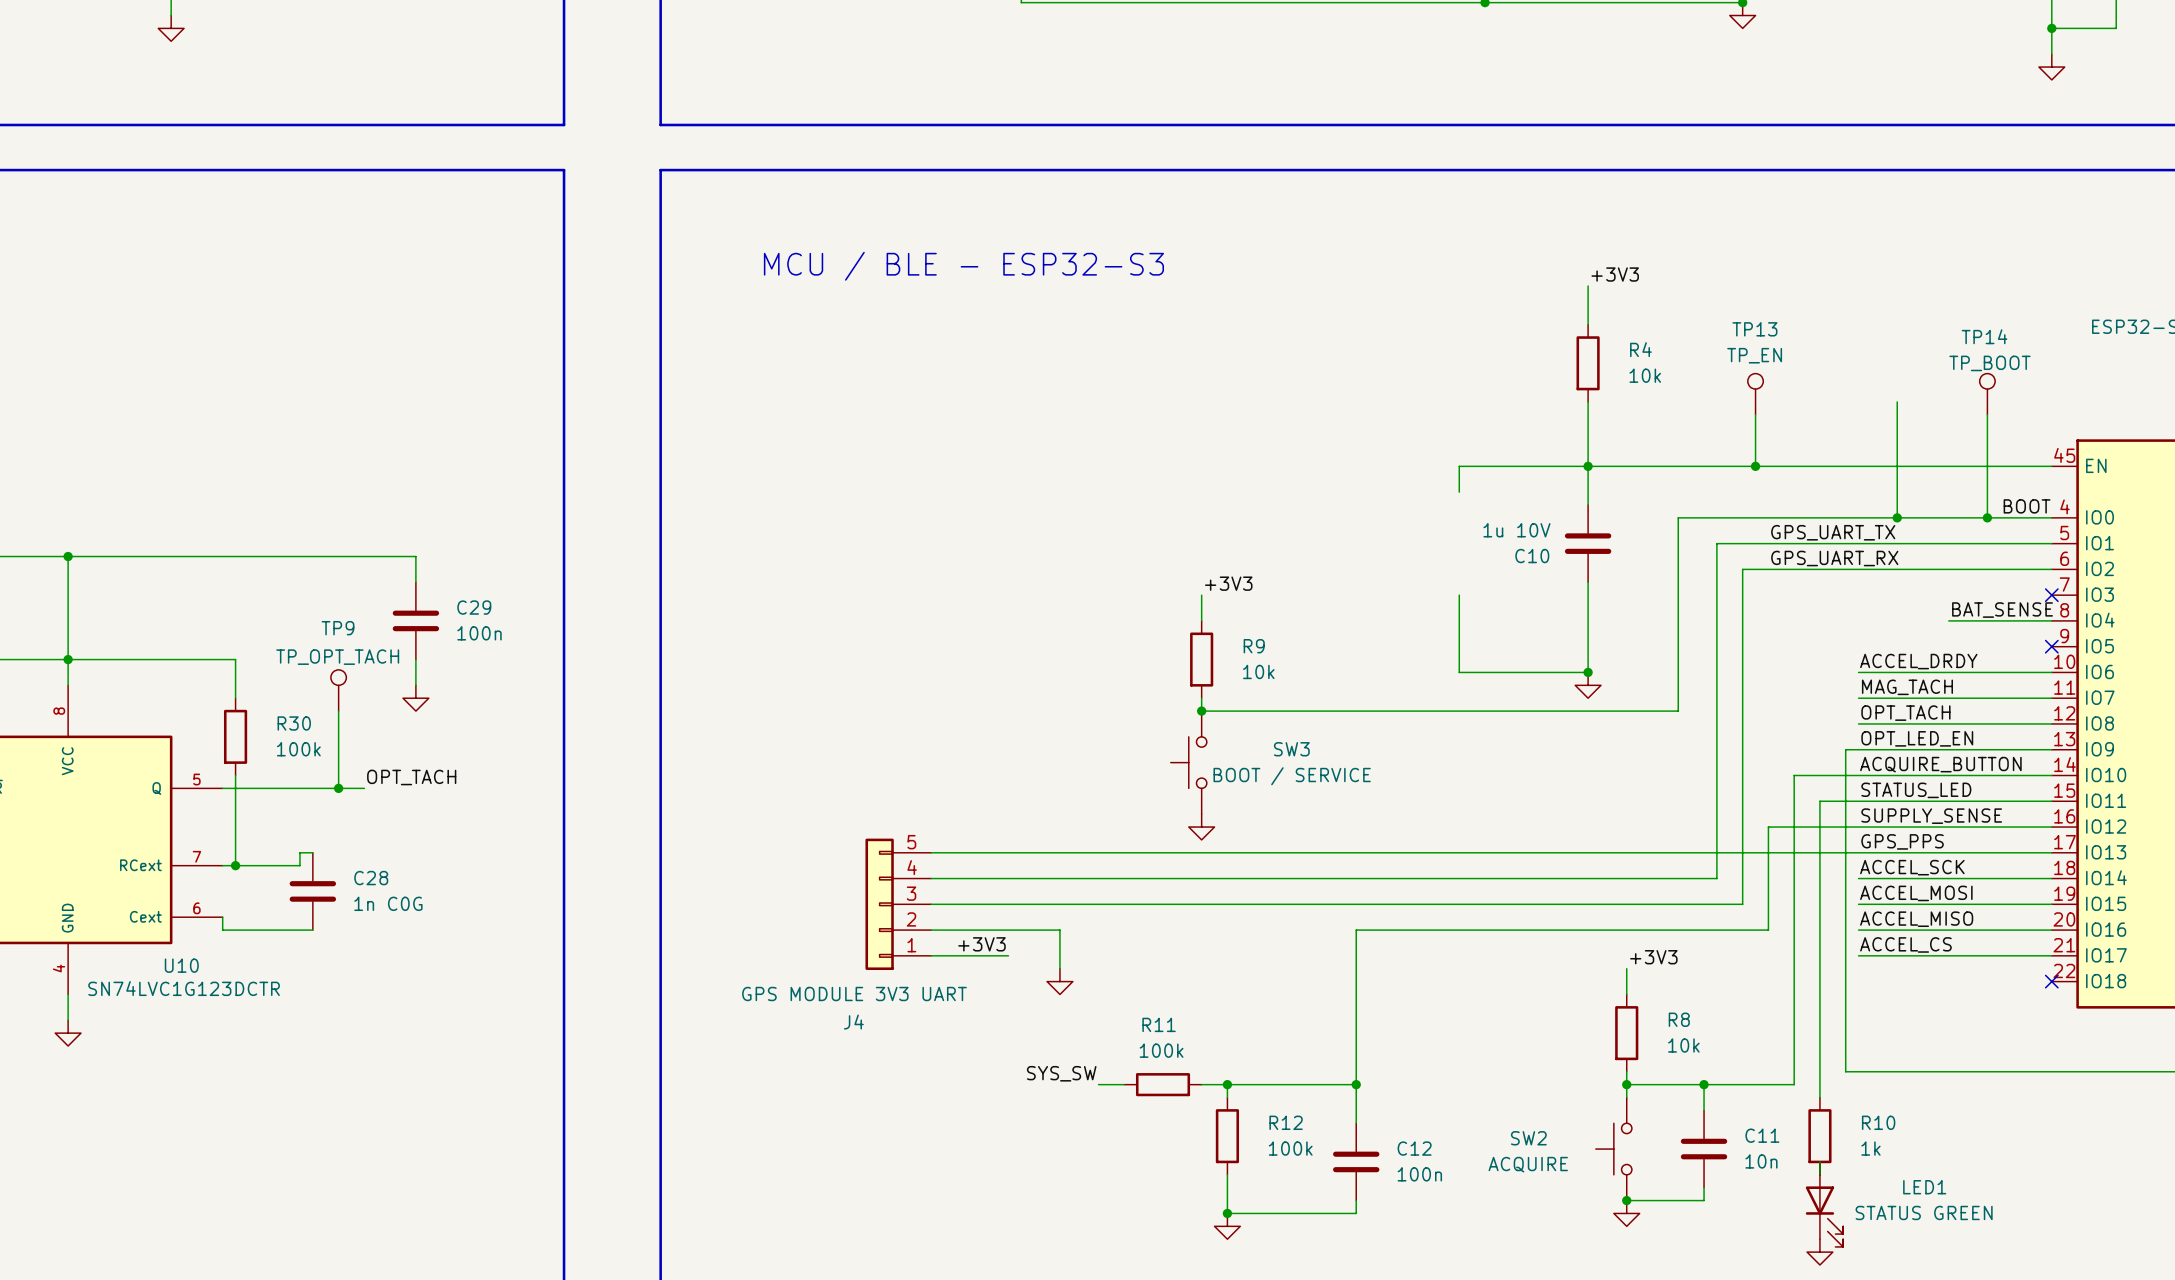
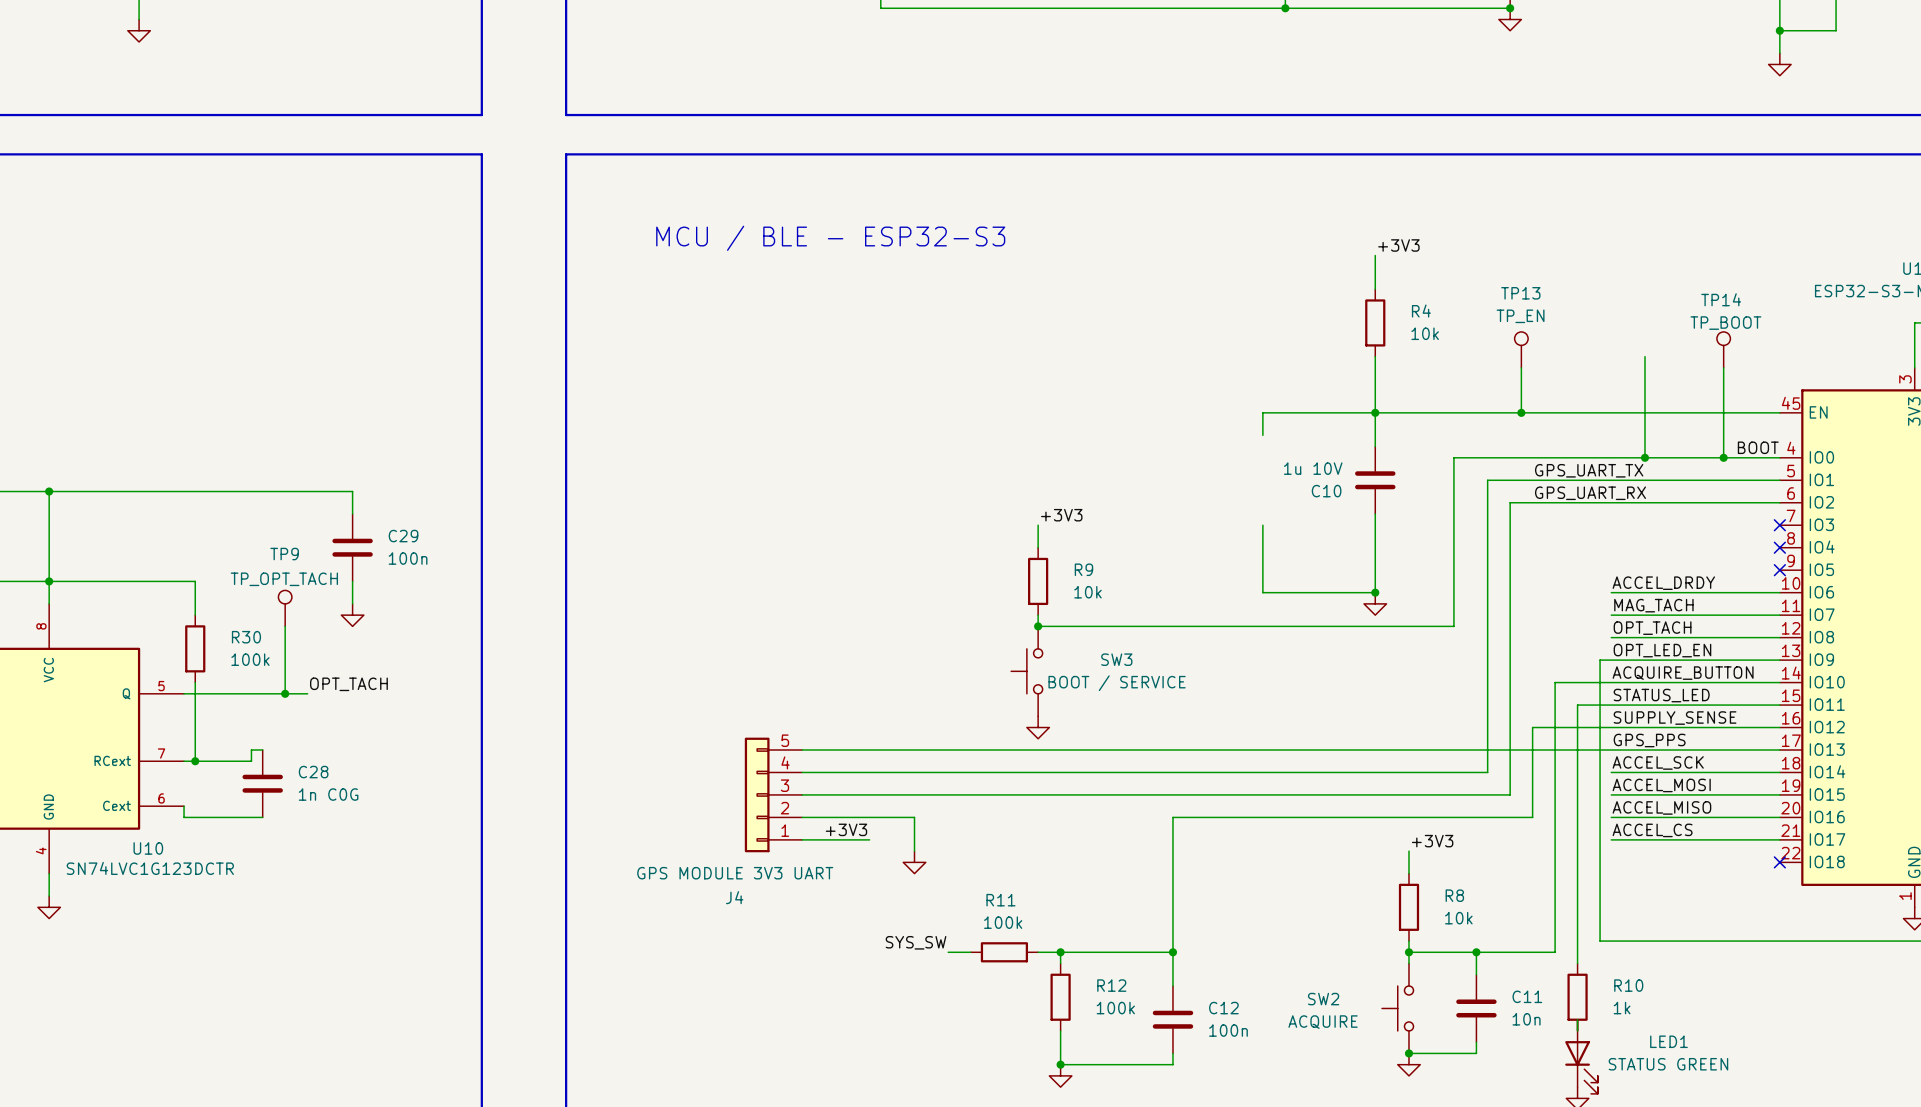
label: BAT_SENSE (2002, 610) -> none
wire: (1948, 620) (2051, 620) -> none
no-connect mark: none -> (1779, 547)

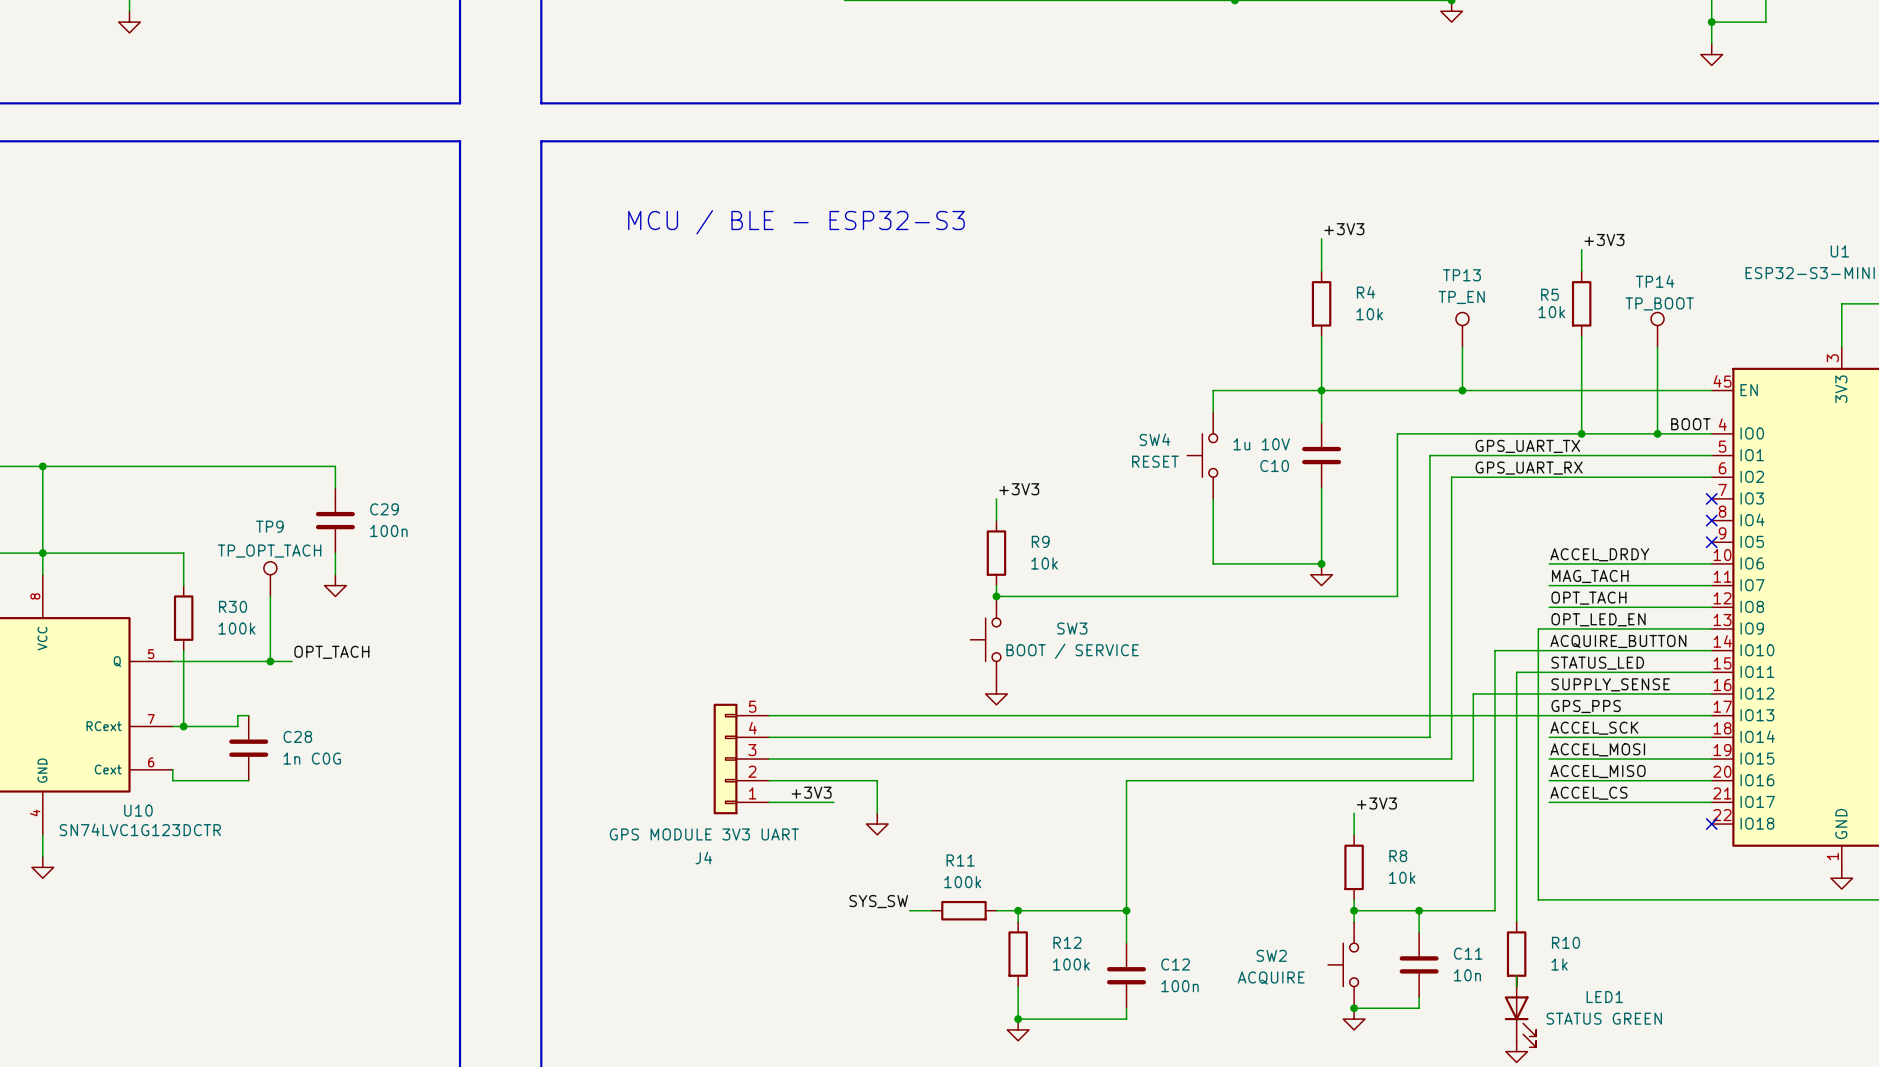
label: none -> +3V3 (1604, 239)
wire: none -> (1581, 249) (1581, 271)
R5: none -> 10k (1581, 303)
SW4: none -> RESET (1202, 455)

